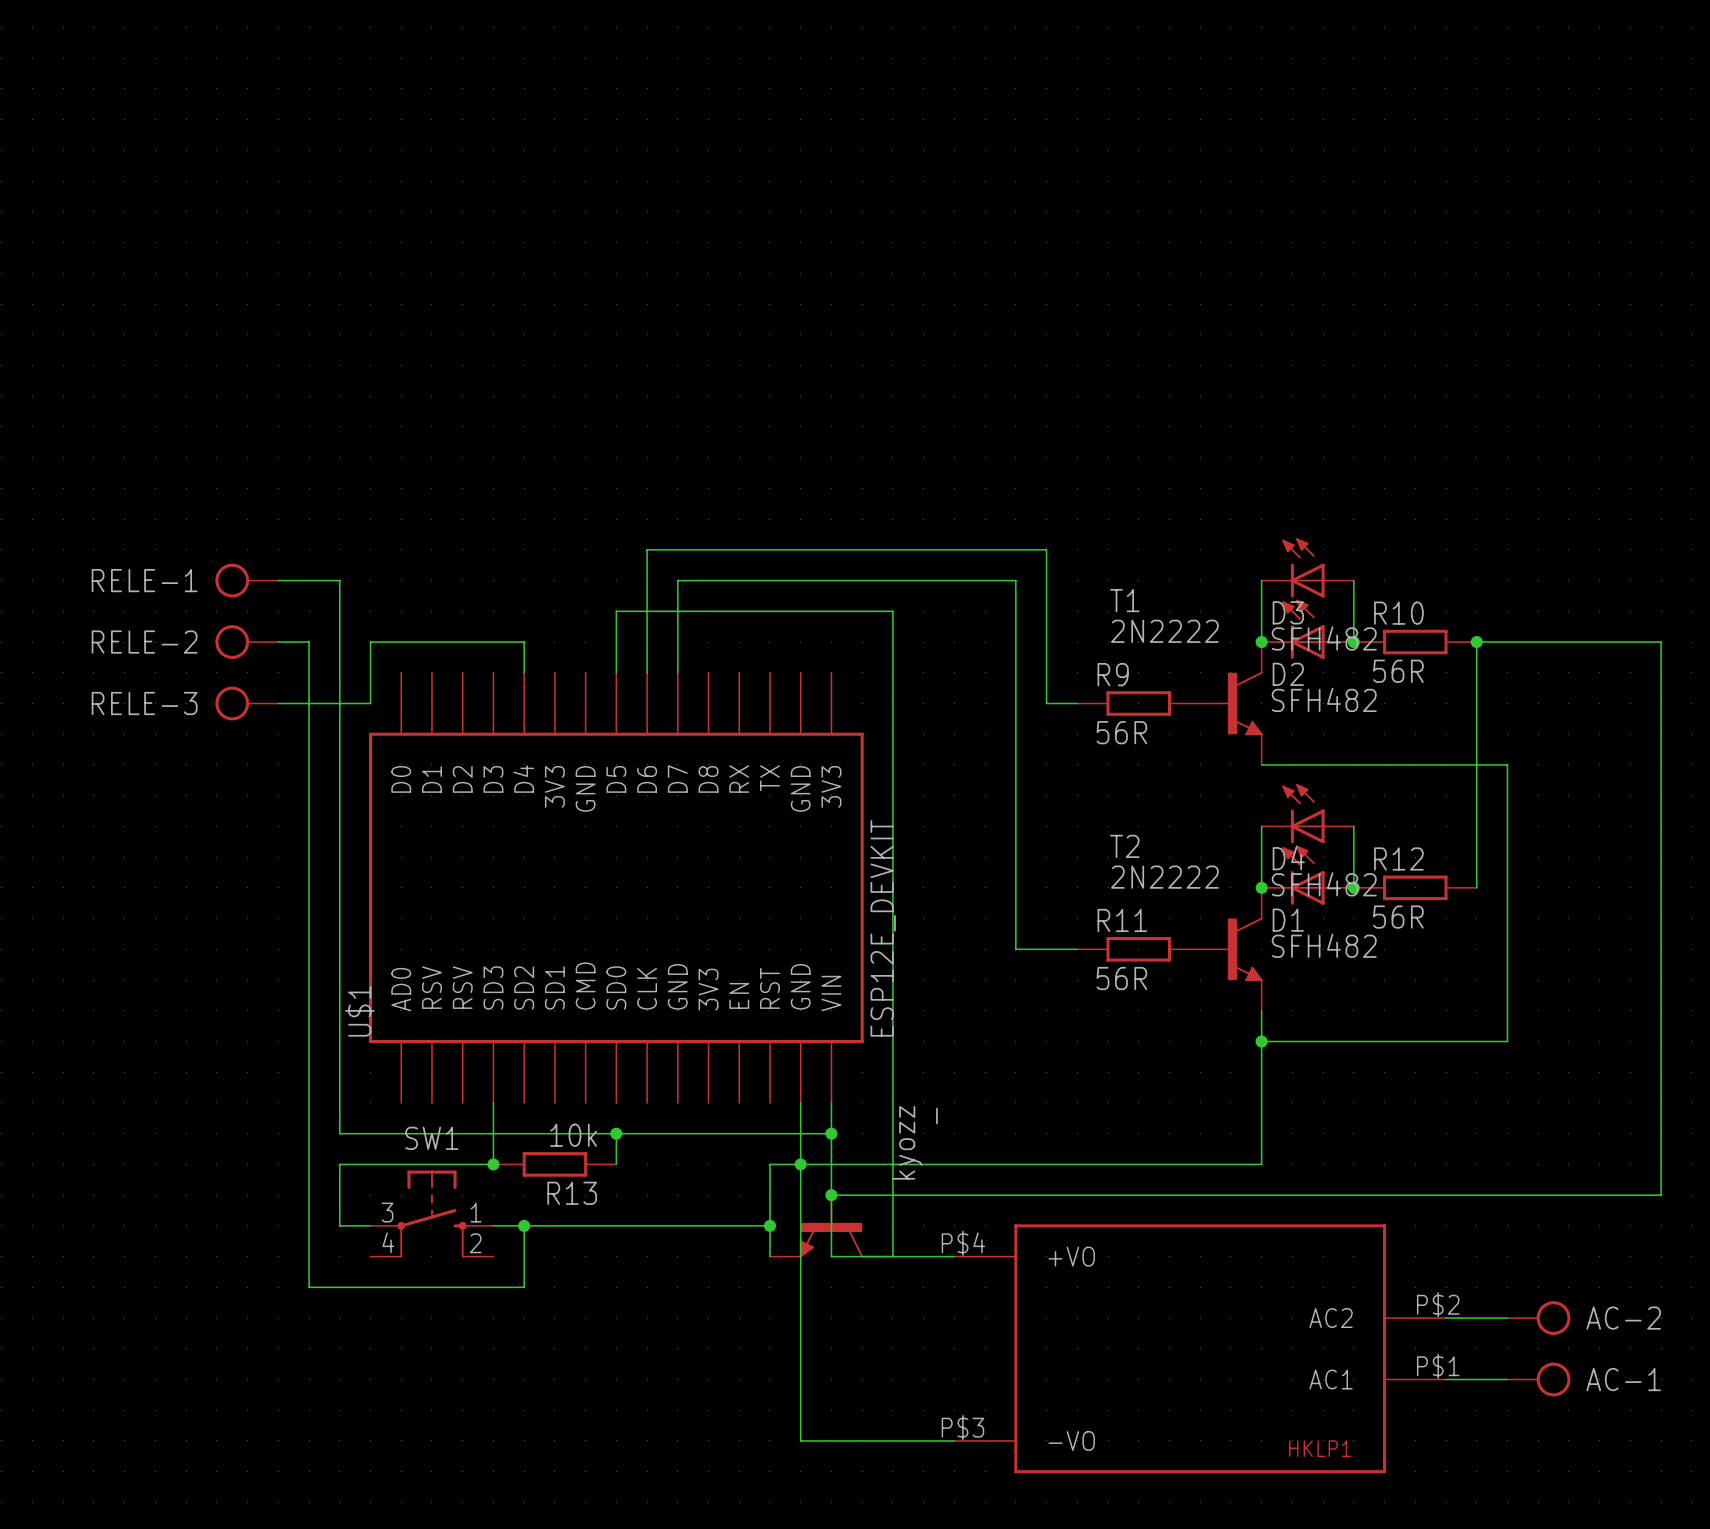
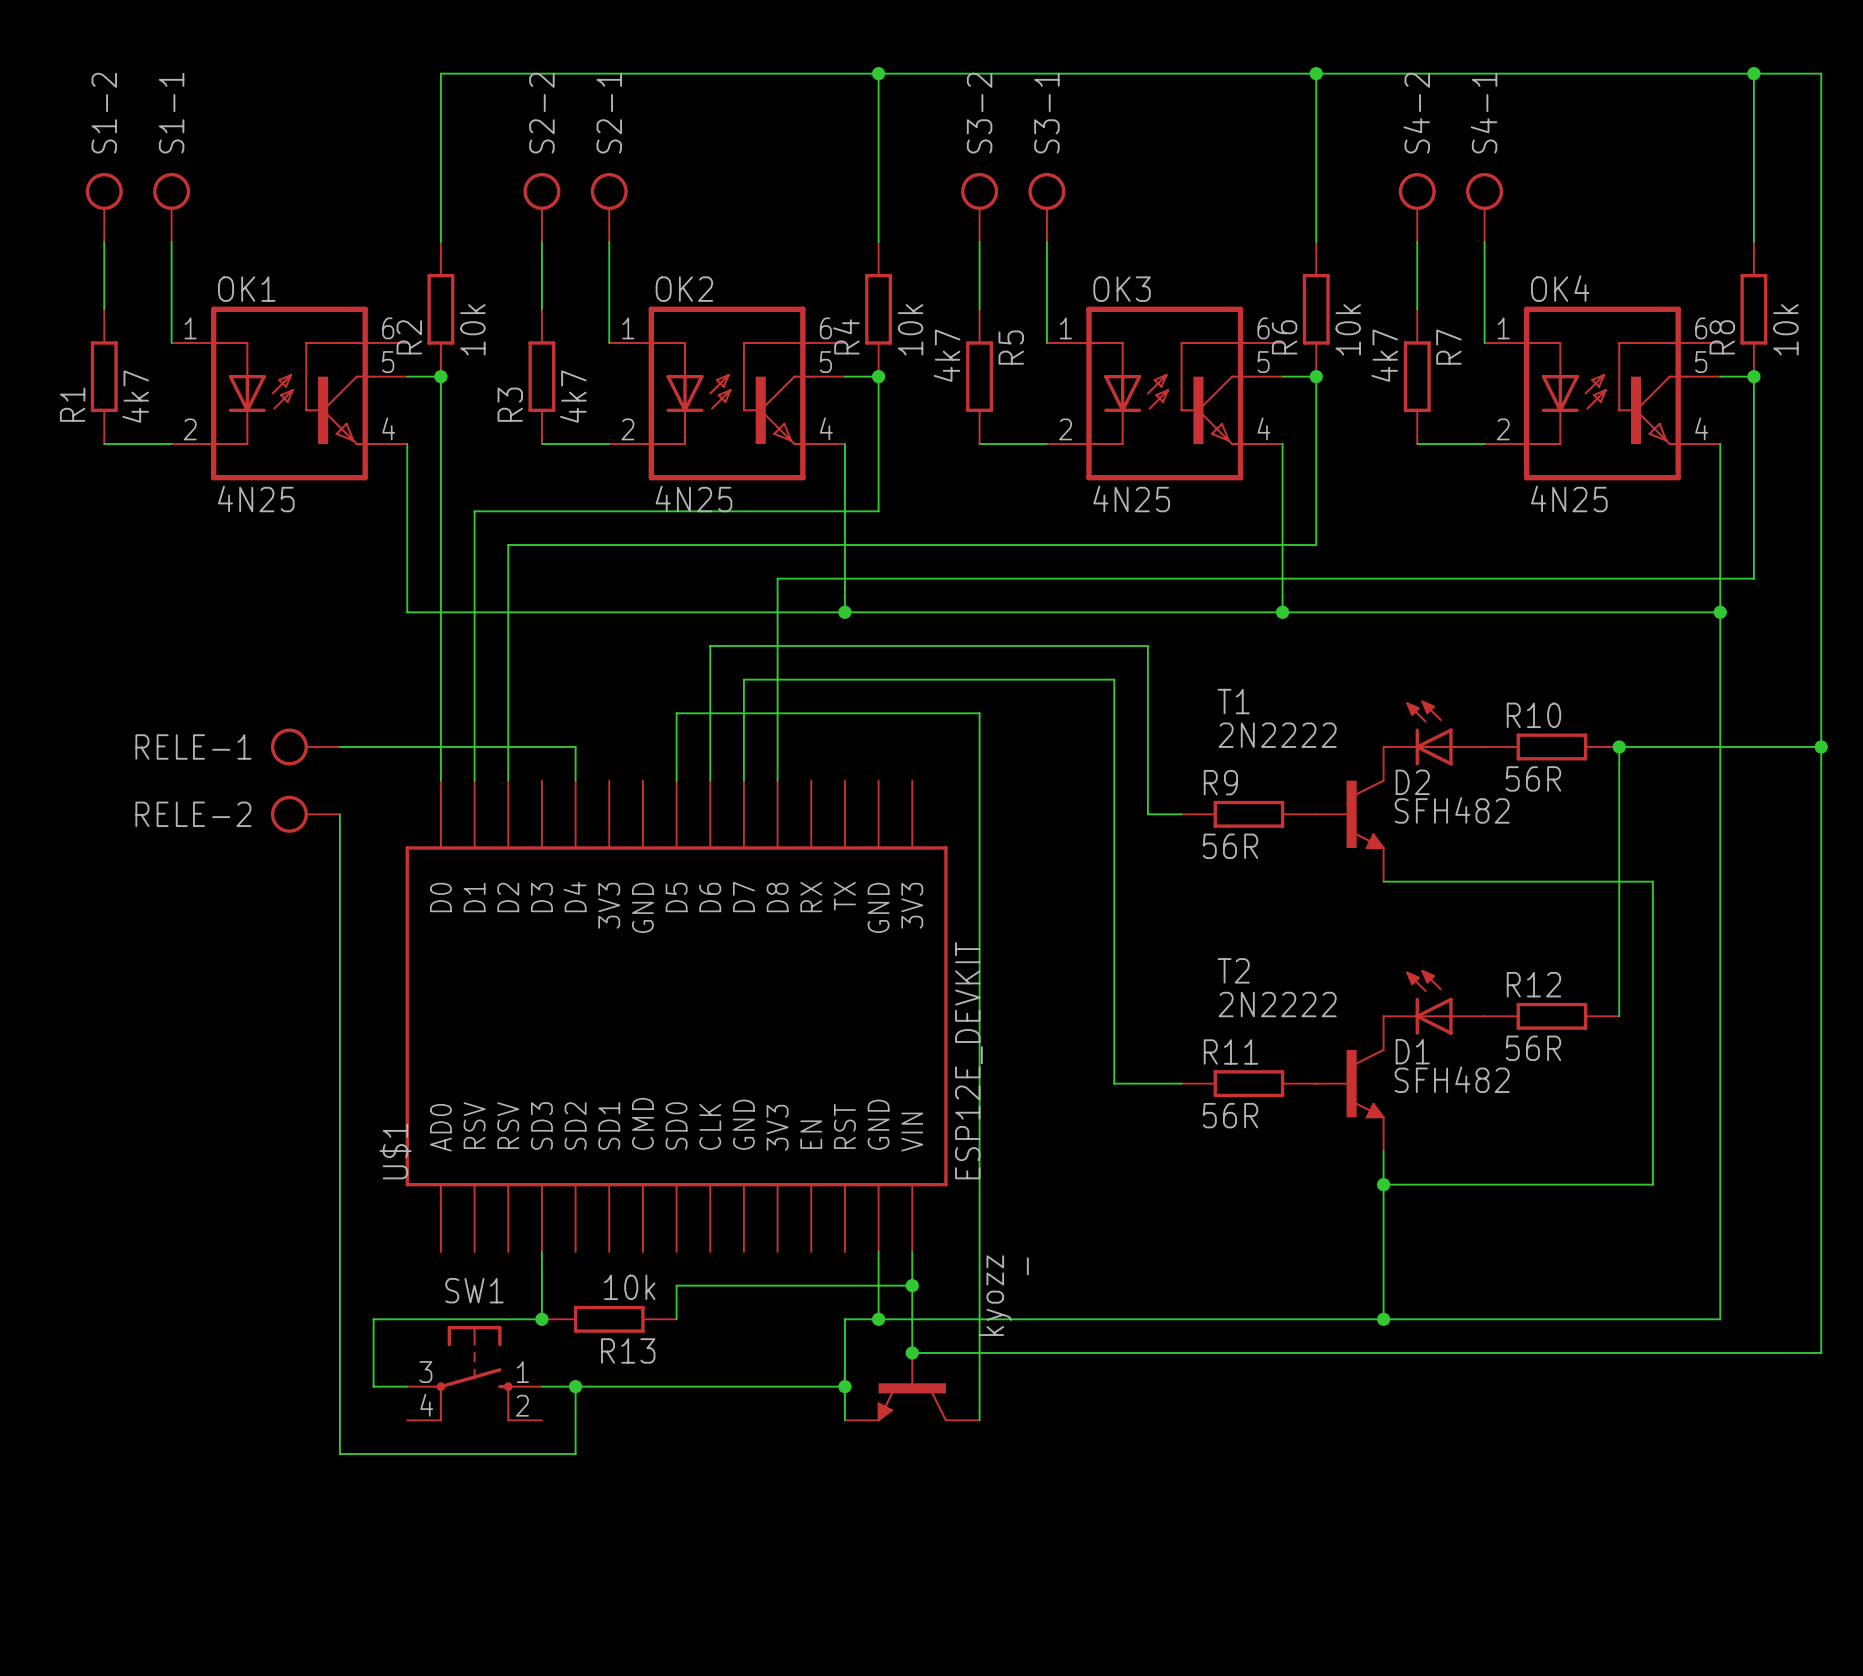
wire: none -> (878, 73) (878, 241)
junction: none -> (878, 73)
wire: none -> (1316, 73) (1316, 241)
junction: none -> (1316, 73)
wire: none -> (1753, 73) (1753, 241)
junction: none -> (1753, 73)
S1-2: none -> (104, 207)
S1-1: none -> (171, 207)
S2-2: none -> (541, 207)
S2-1: none -> (609, 207)
S3-2: none -> (979, 207)
S3-1: none -> (1046, 207)
S4-2: none -> (1417, 207)
S4-1: none -> (1484, 207)
wire: none -> (104, 241) (104, 309)
wire: none -> (171, 241) (171, 342)
wire: none -> (440, 241) (440, 73) (1821, 73) (1821, 746)
wire: none -> (541, 241) (541, 309)
wire: none -> (609, 241) (609, 342)
wire: none -> (979, 241) (979, 309)
wire: none -> (1046, 241) (1046, 342)
wire: none -> (1417, 241) (1417, 309)
wire: none -> (1484, 241) (1484, 342)
R2: none -> 10k (440, 309)
R4: none -> 10k (878, 309)
R6: none -> 10k (1316, 309)
R8: none -> 10k (1753, 309)
R1: none -> 4k7 (104, 376)
wire: none -> (407, 376) (440, 376) (440, 780)
junction: none -> (440, 376)
R3: none -> 4k7 (541, 376)
wire: none -> (844, 376) (878, 376) (878, 511) (474, 511) (474, 780)
junction: none -> (878, 376)
R5: none -> 4k7 (979, 376)
wire: none -> (1282, 376) (1316, 376) (1316, 544) (508, 544) (508, 780)
junction: none -> (1316, 376)
R7: none -> 4k7 (1417, 376)
wire: none -> (1720, 376) (1753, 376) (1753, 578) (777, 578) (777, 780)
junction: none -> (1753, 376)
OK1: none -> 4N25 (289, 393)
OK2: none -> 4N25 (727, 393)
OK3: none -> 4N25 (1164, 393)
OK4: none -> 4N25 (1602, 393)
wire: none -> (104, 443) (171, 443)
wire: none -> (407, 443) (407, 612) (1720, 612)
wire: none -> (541, 443) (609, 443)
wire: none -> (844, 443) (844, 612)
wire: none -> (979, 443) (1046, 443)
wire: none -> (1282, 443) (1282, 612)
wire: none -> (1417, 443) (1484, 443)
wire: none -> (1720, 443) (1720, 1319) (1383, 1319)
junction: none -> (844, 612)
junction: none -> (1282, 612)
junction: none -> (1720, 612)
D3: SFH482 (1307, 567) -> none
RELE-1 position: (246, 580) -> (305, 746)
wire: (278, 580) (339, 580) (339, 1133) (616, 1133) -> none
wire: (1261, 580) (1261, 642) -> none
wire: (1353, 580) (1353, 642) -> none
RELE-2 position: (246, 642) -> (305, 814)
wire: (278, 642) (309, 642) (309, 703) -> none
wire: (370, 642) (370, 703) (278, 703) -> (407, 746) (339, 746)
junction: (1261, 642) -> none
junction: (1353, 642) -> none
junction: none -> (1821, 746)
RELE-3: (246, 703) -> none
D4: SFH482 (1307, 813) -> none
wire: (1261, 826) (1261, 887) -> none
wire: (1353, 826) (1353, 887) -> none
junction: (1261, 887) -> none
junction: (1353, 887) -> none
junction: (616, 1133) -> none
wire: (800, 1164) (800, 1440) (954, 1440) -> none
junction: none -> (1383, 1319)
wire: (831, 1195) (831, 1256) (954, 1256) -> none
wire: (1446, 1318) (1507, 1318) -> none
AC-2: (1538, 1318) -> none
HKLP1: (1200, 1348) -> none
wire: (1446, 1379) (1507, 1379) -> none
AC-1: (1538, 1379) -> none

